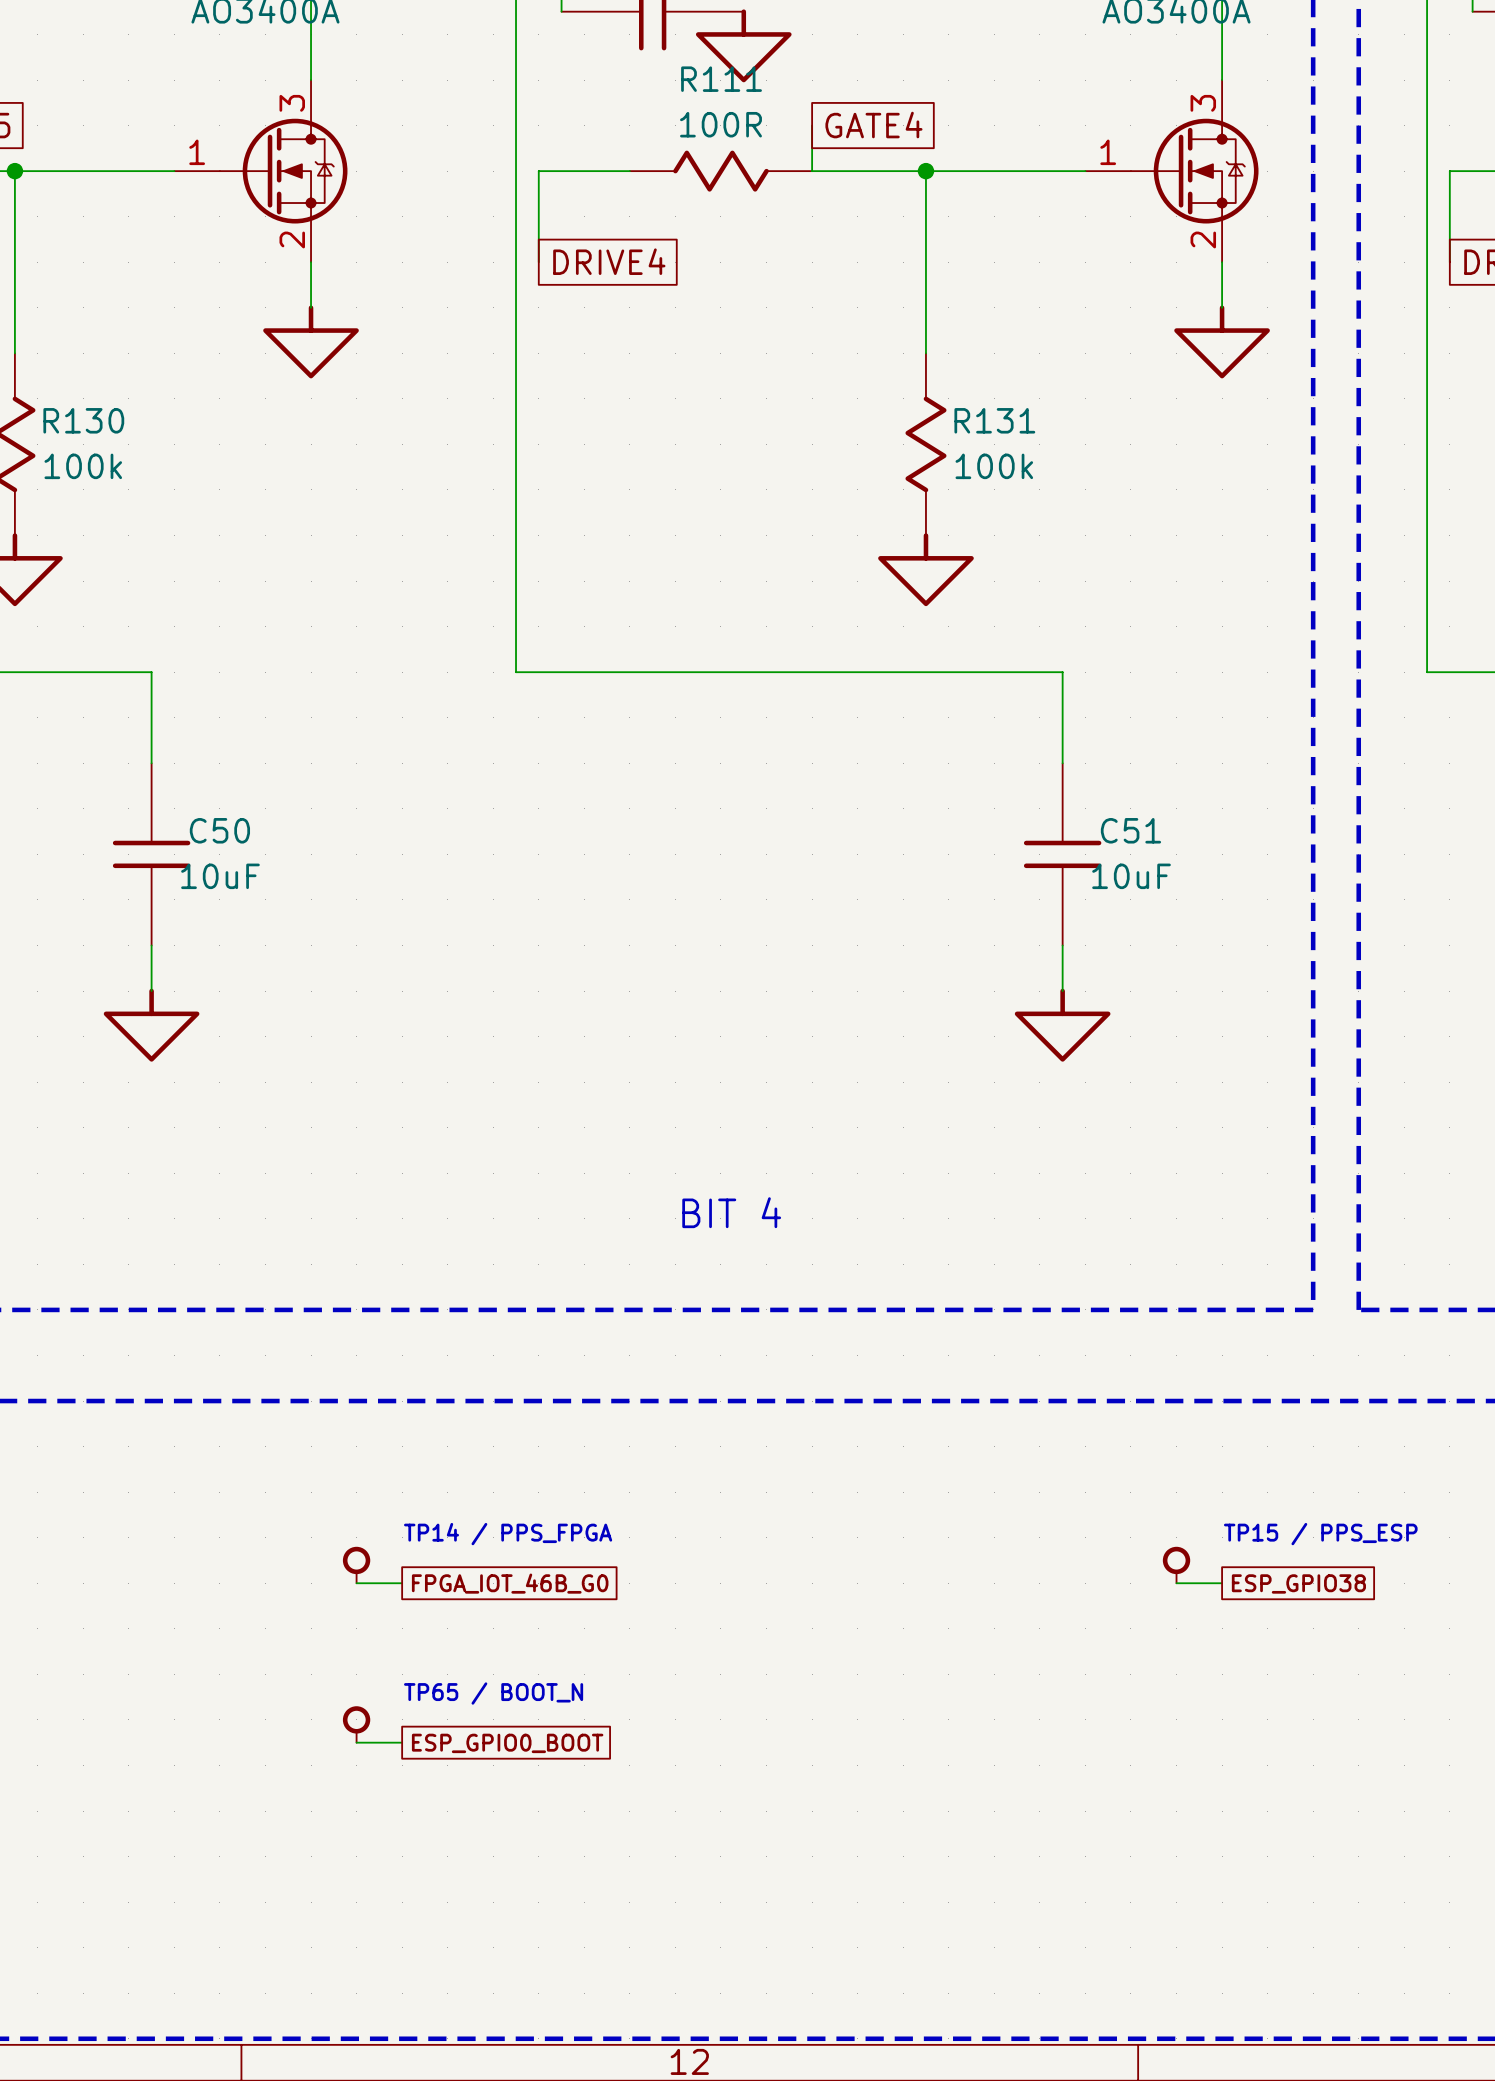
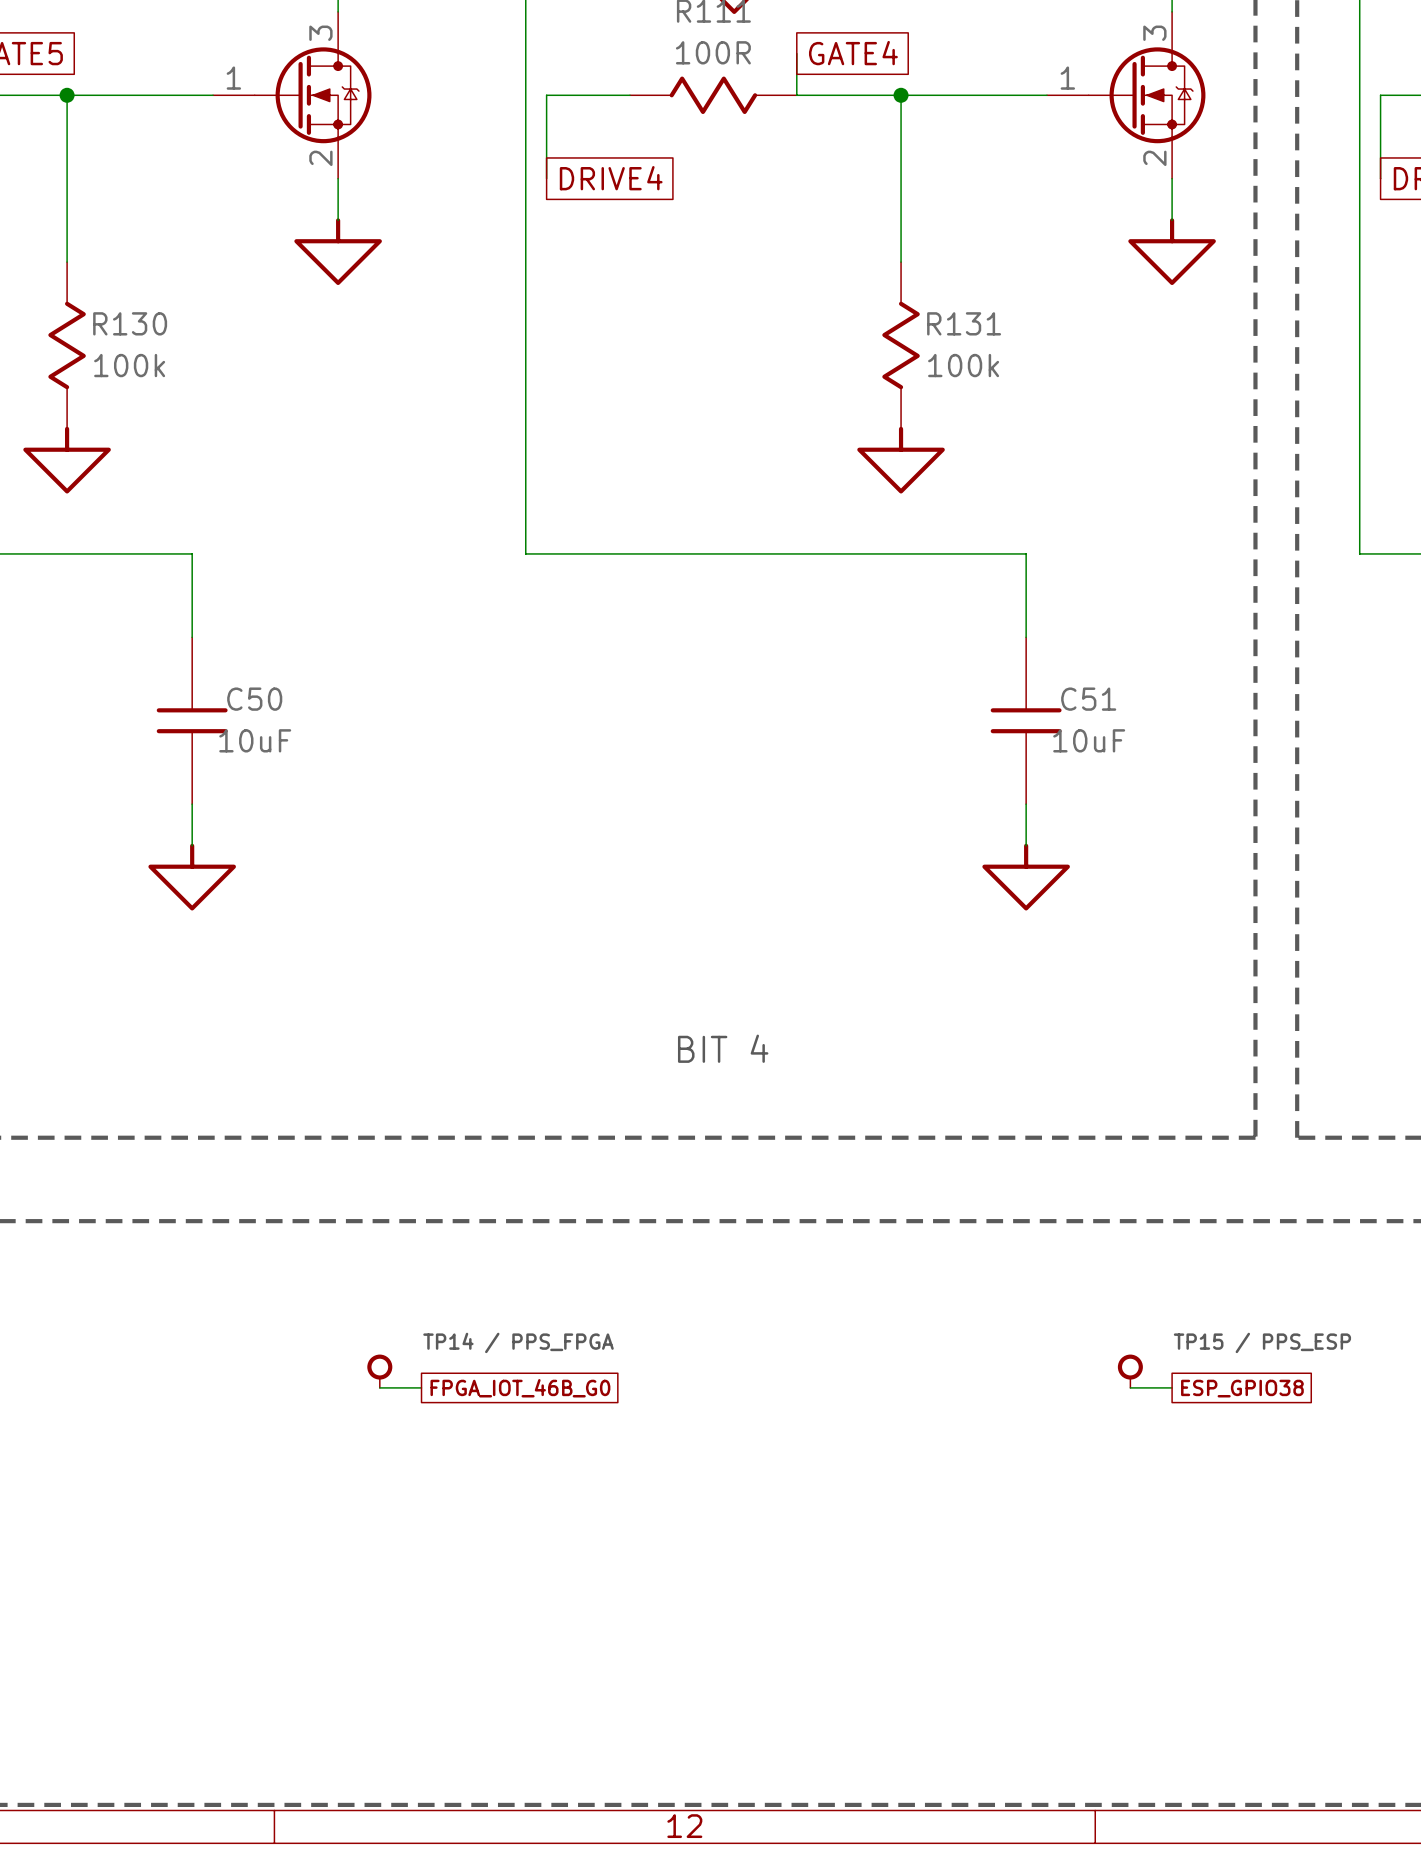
text: TP65 / BOOT_N (493, 1693) -> none
part: (356, 1724) -> none
wire: (356, 1742) (402, 1742) -> none
global label: ESP_GPIO0_BOOT (507, 1743) -> none

